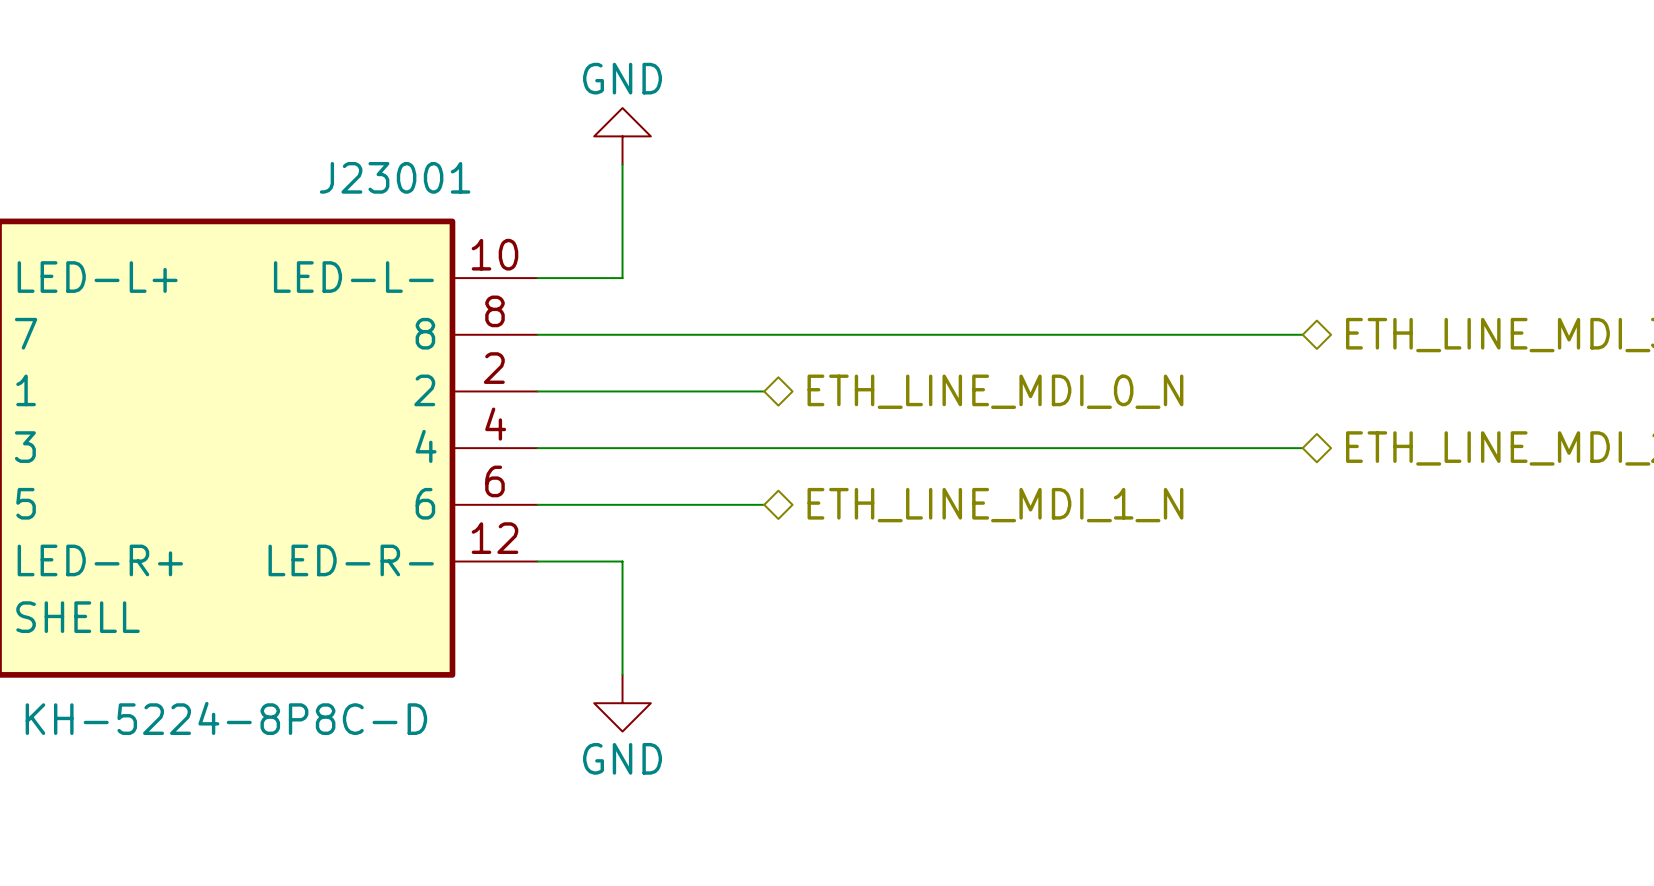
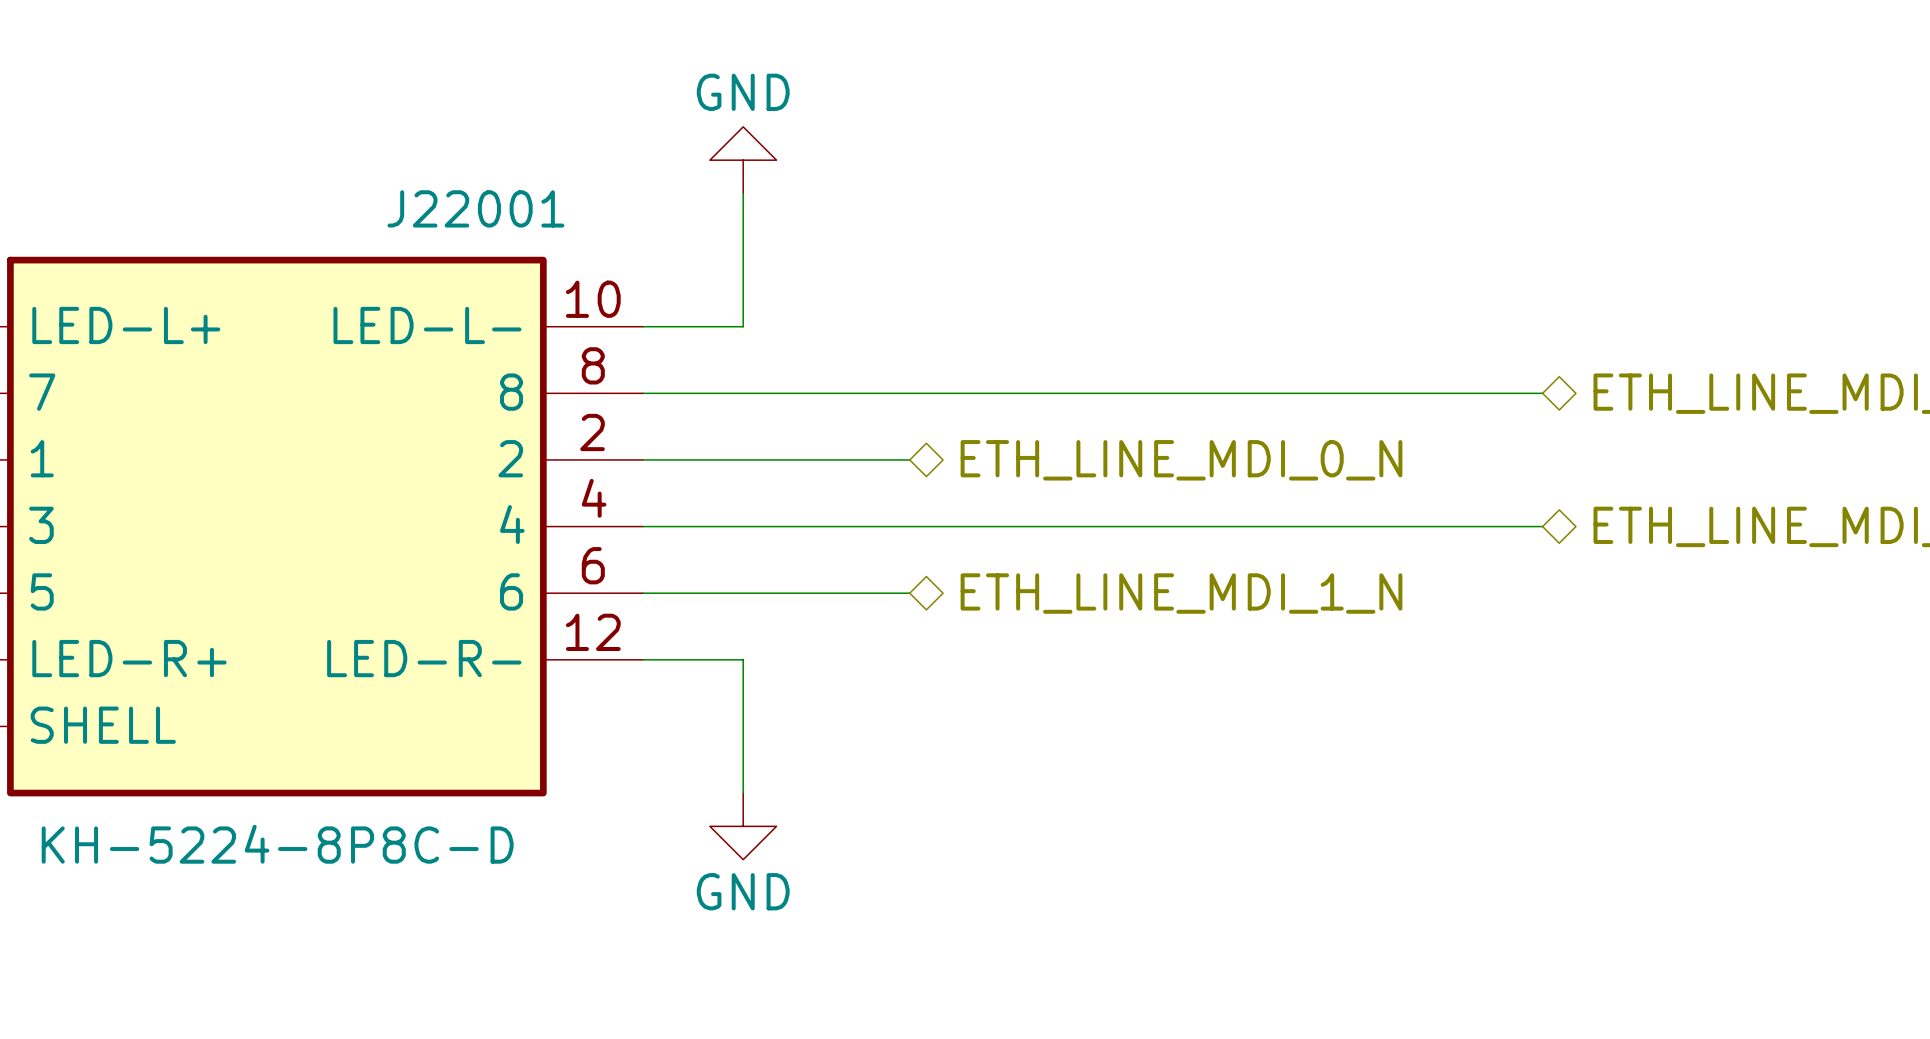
J23001 name: J23001 (395, 177) -> J22001 (475, 208)

